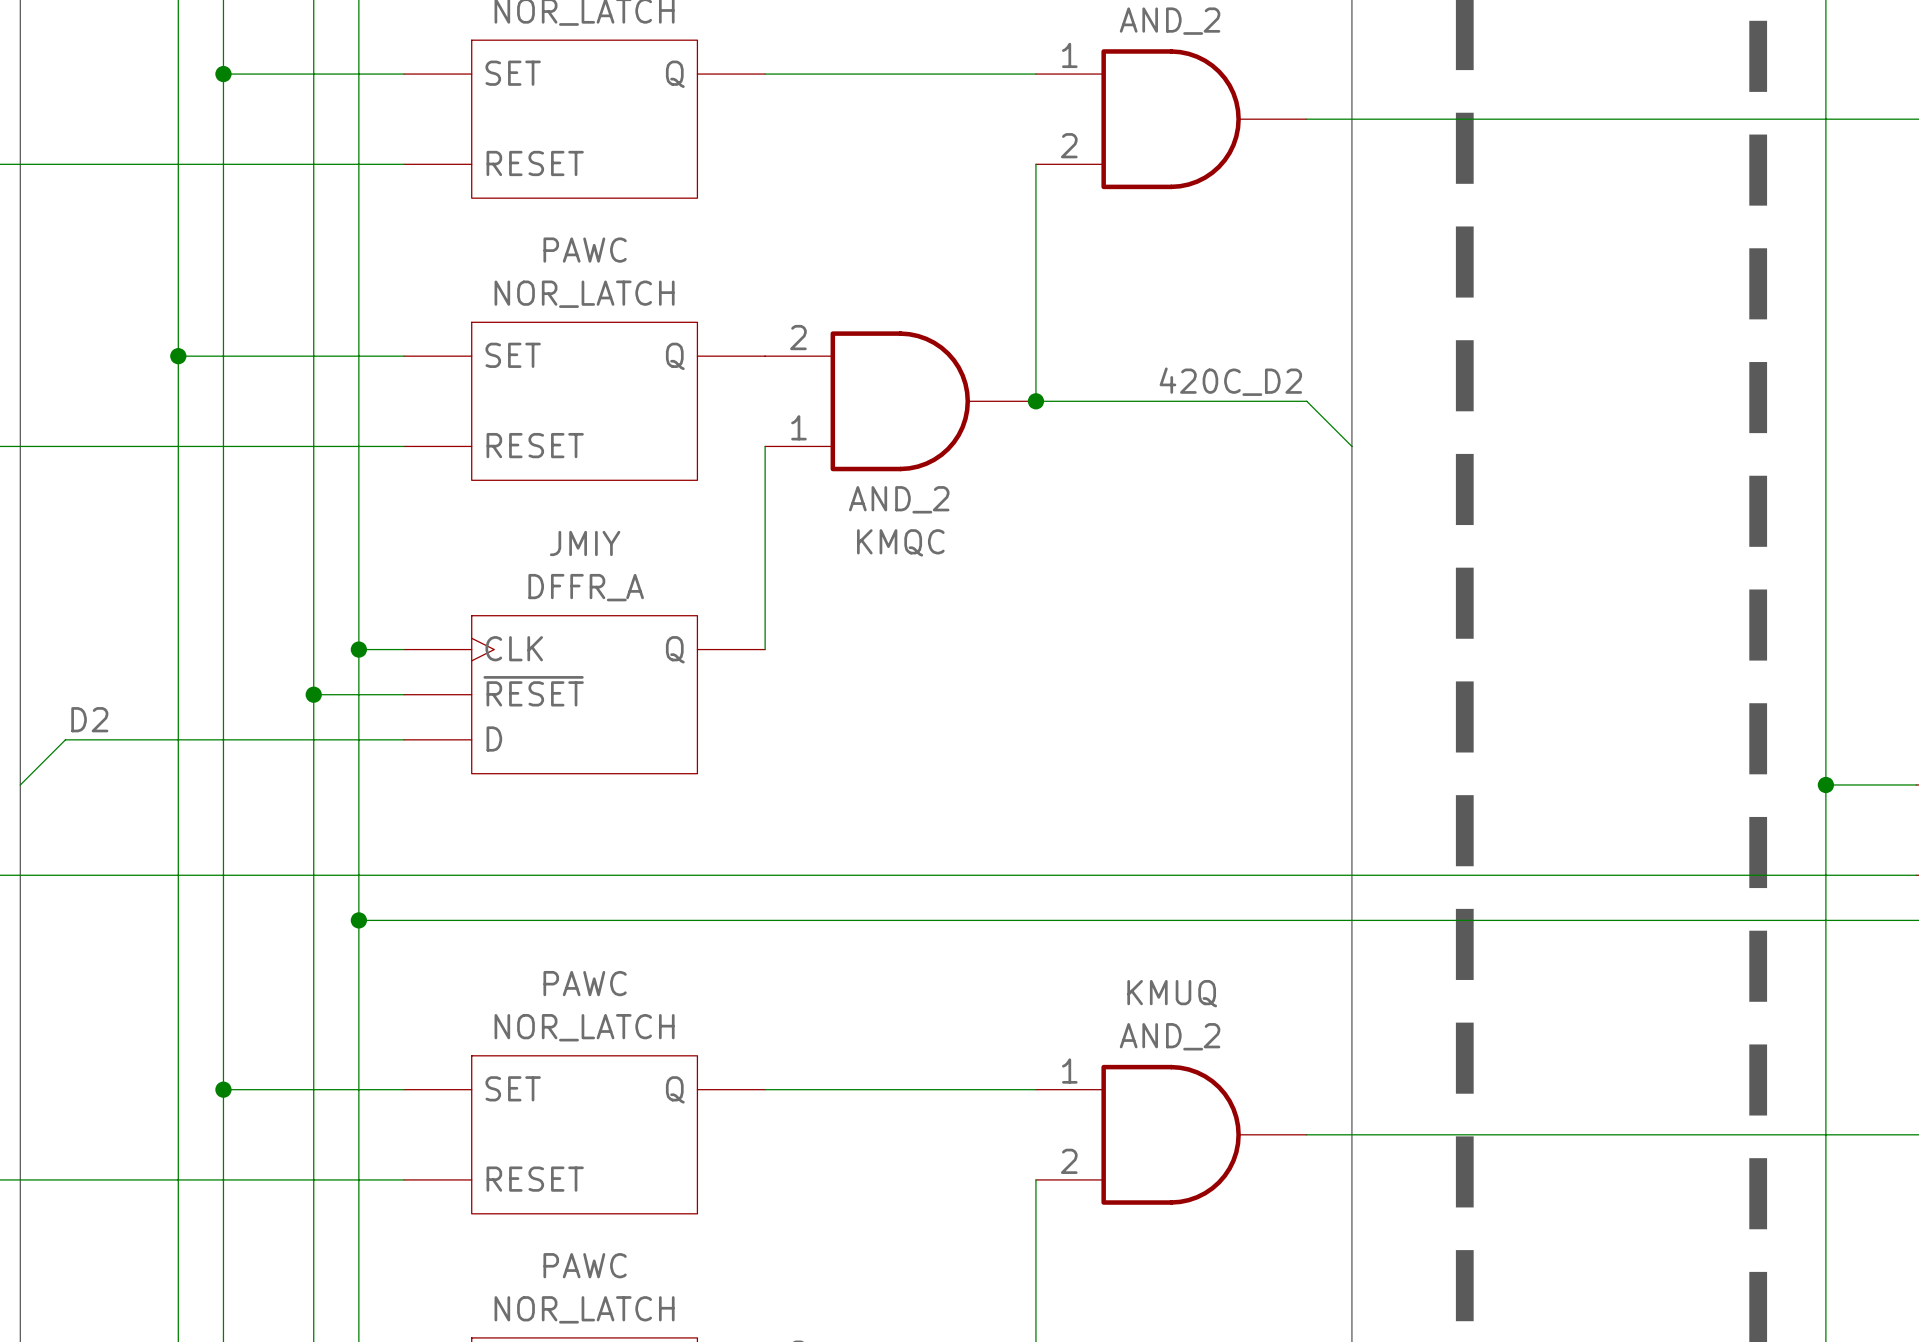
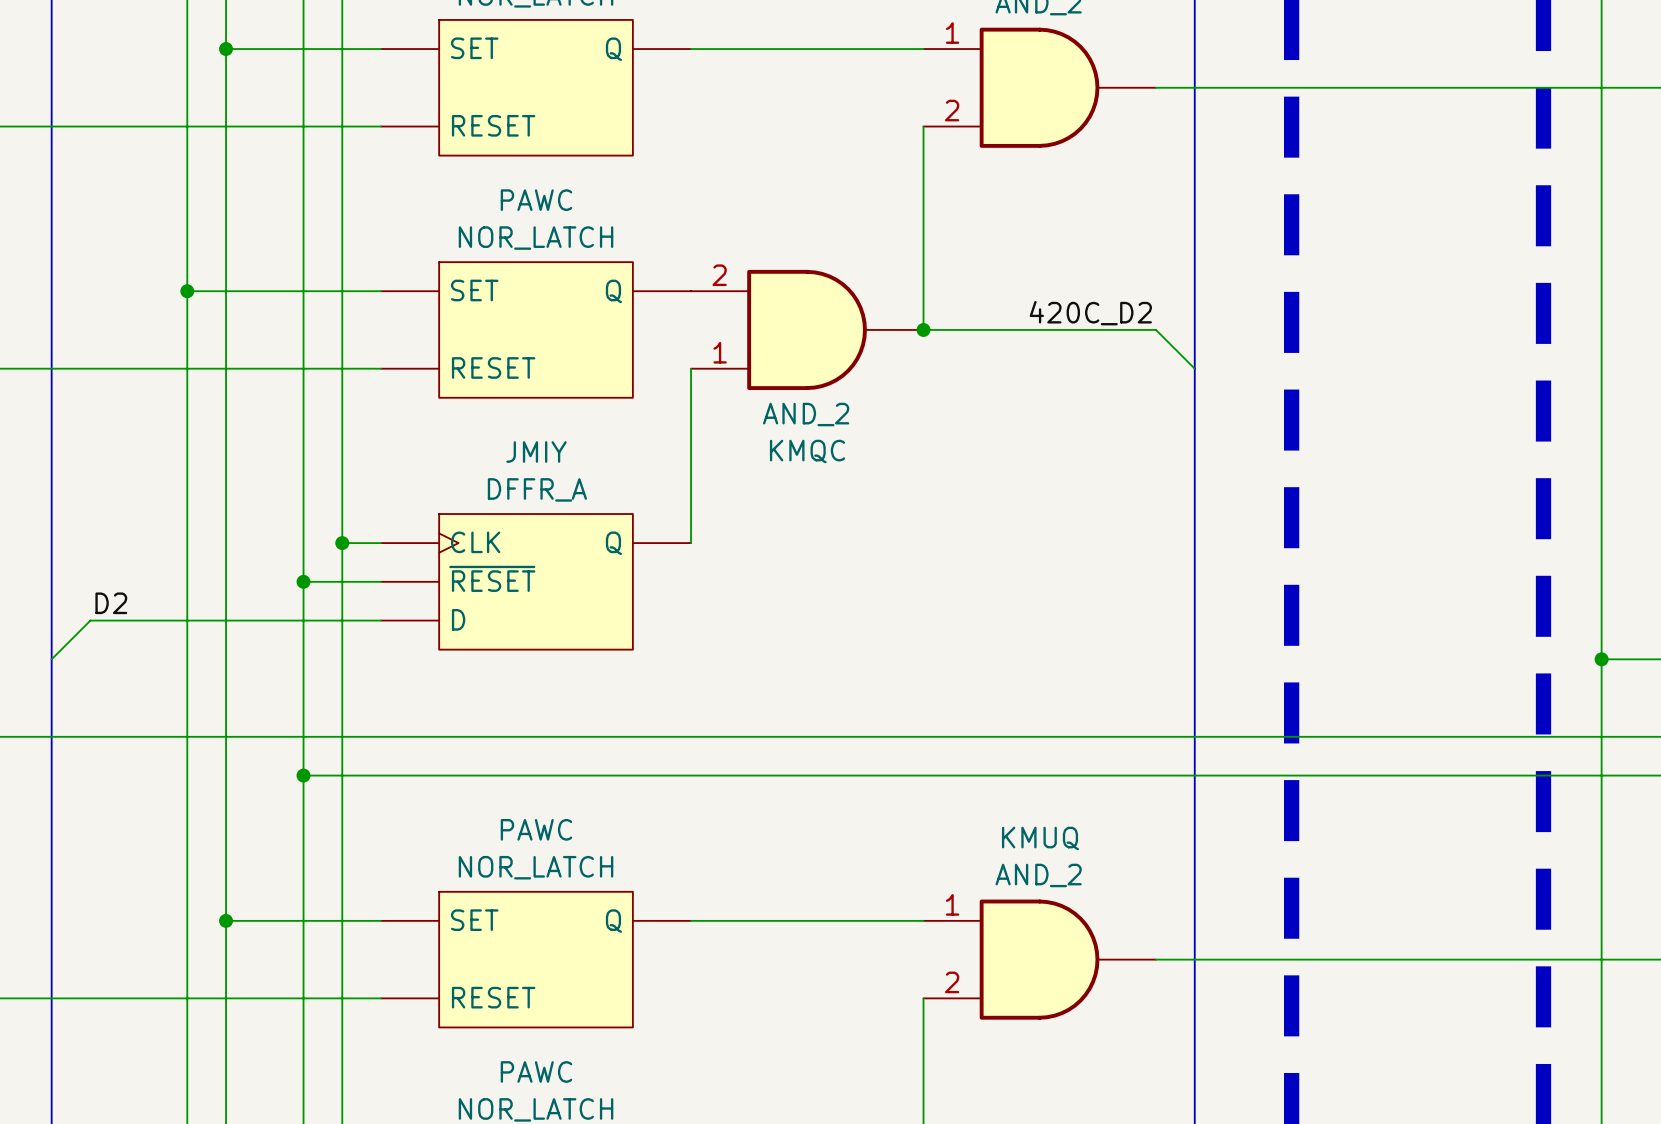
wire: none -> (303, 775) (342, 775)
junction position: (358, 920) -> (303, 775)

